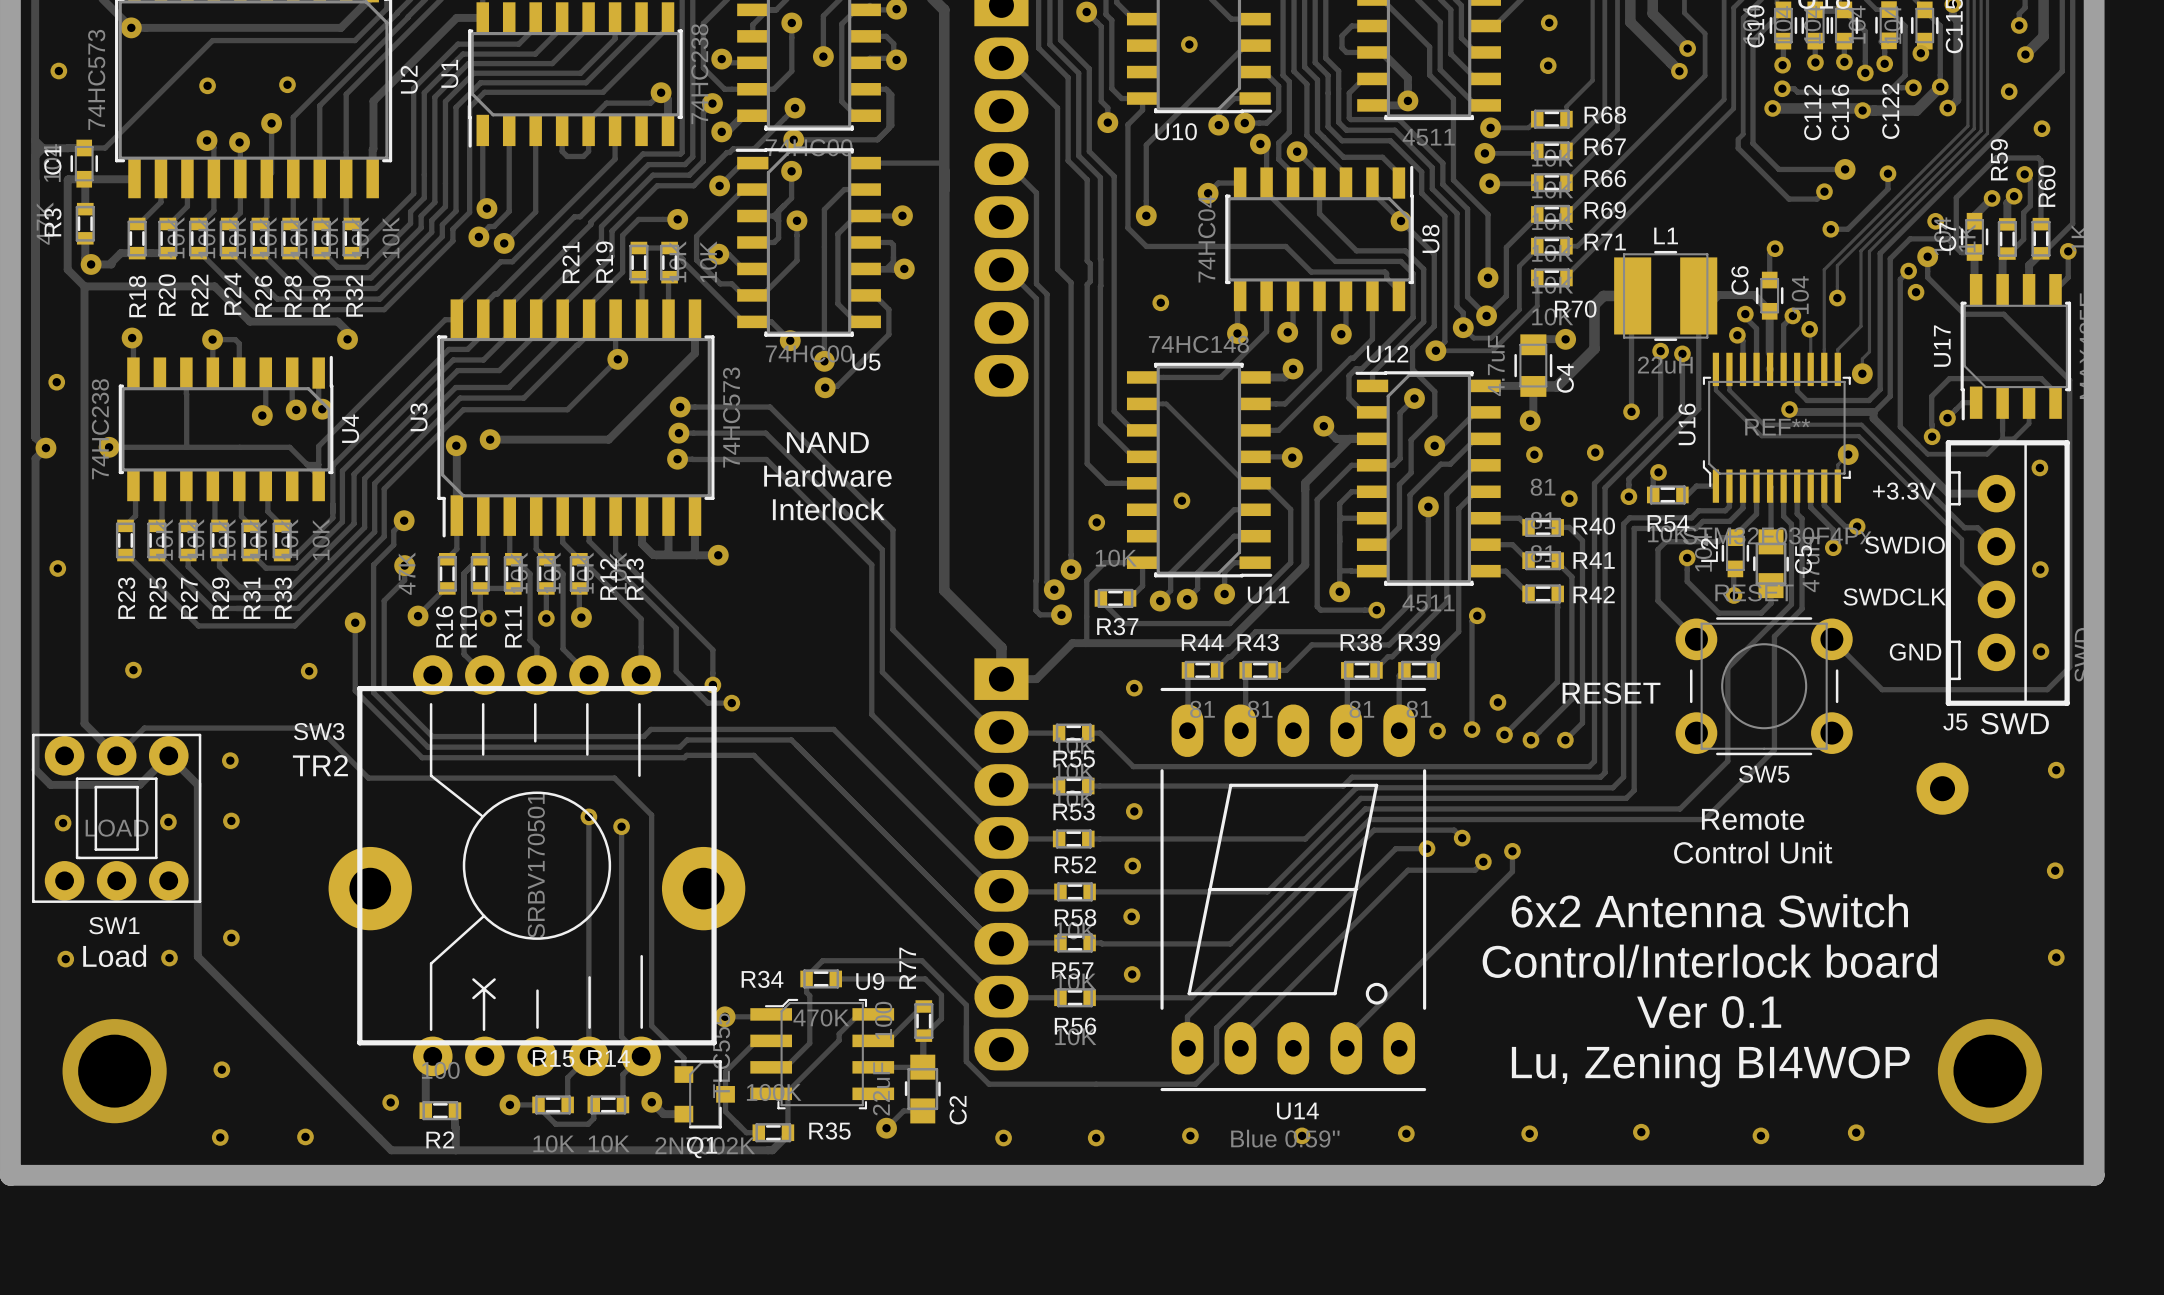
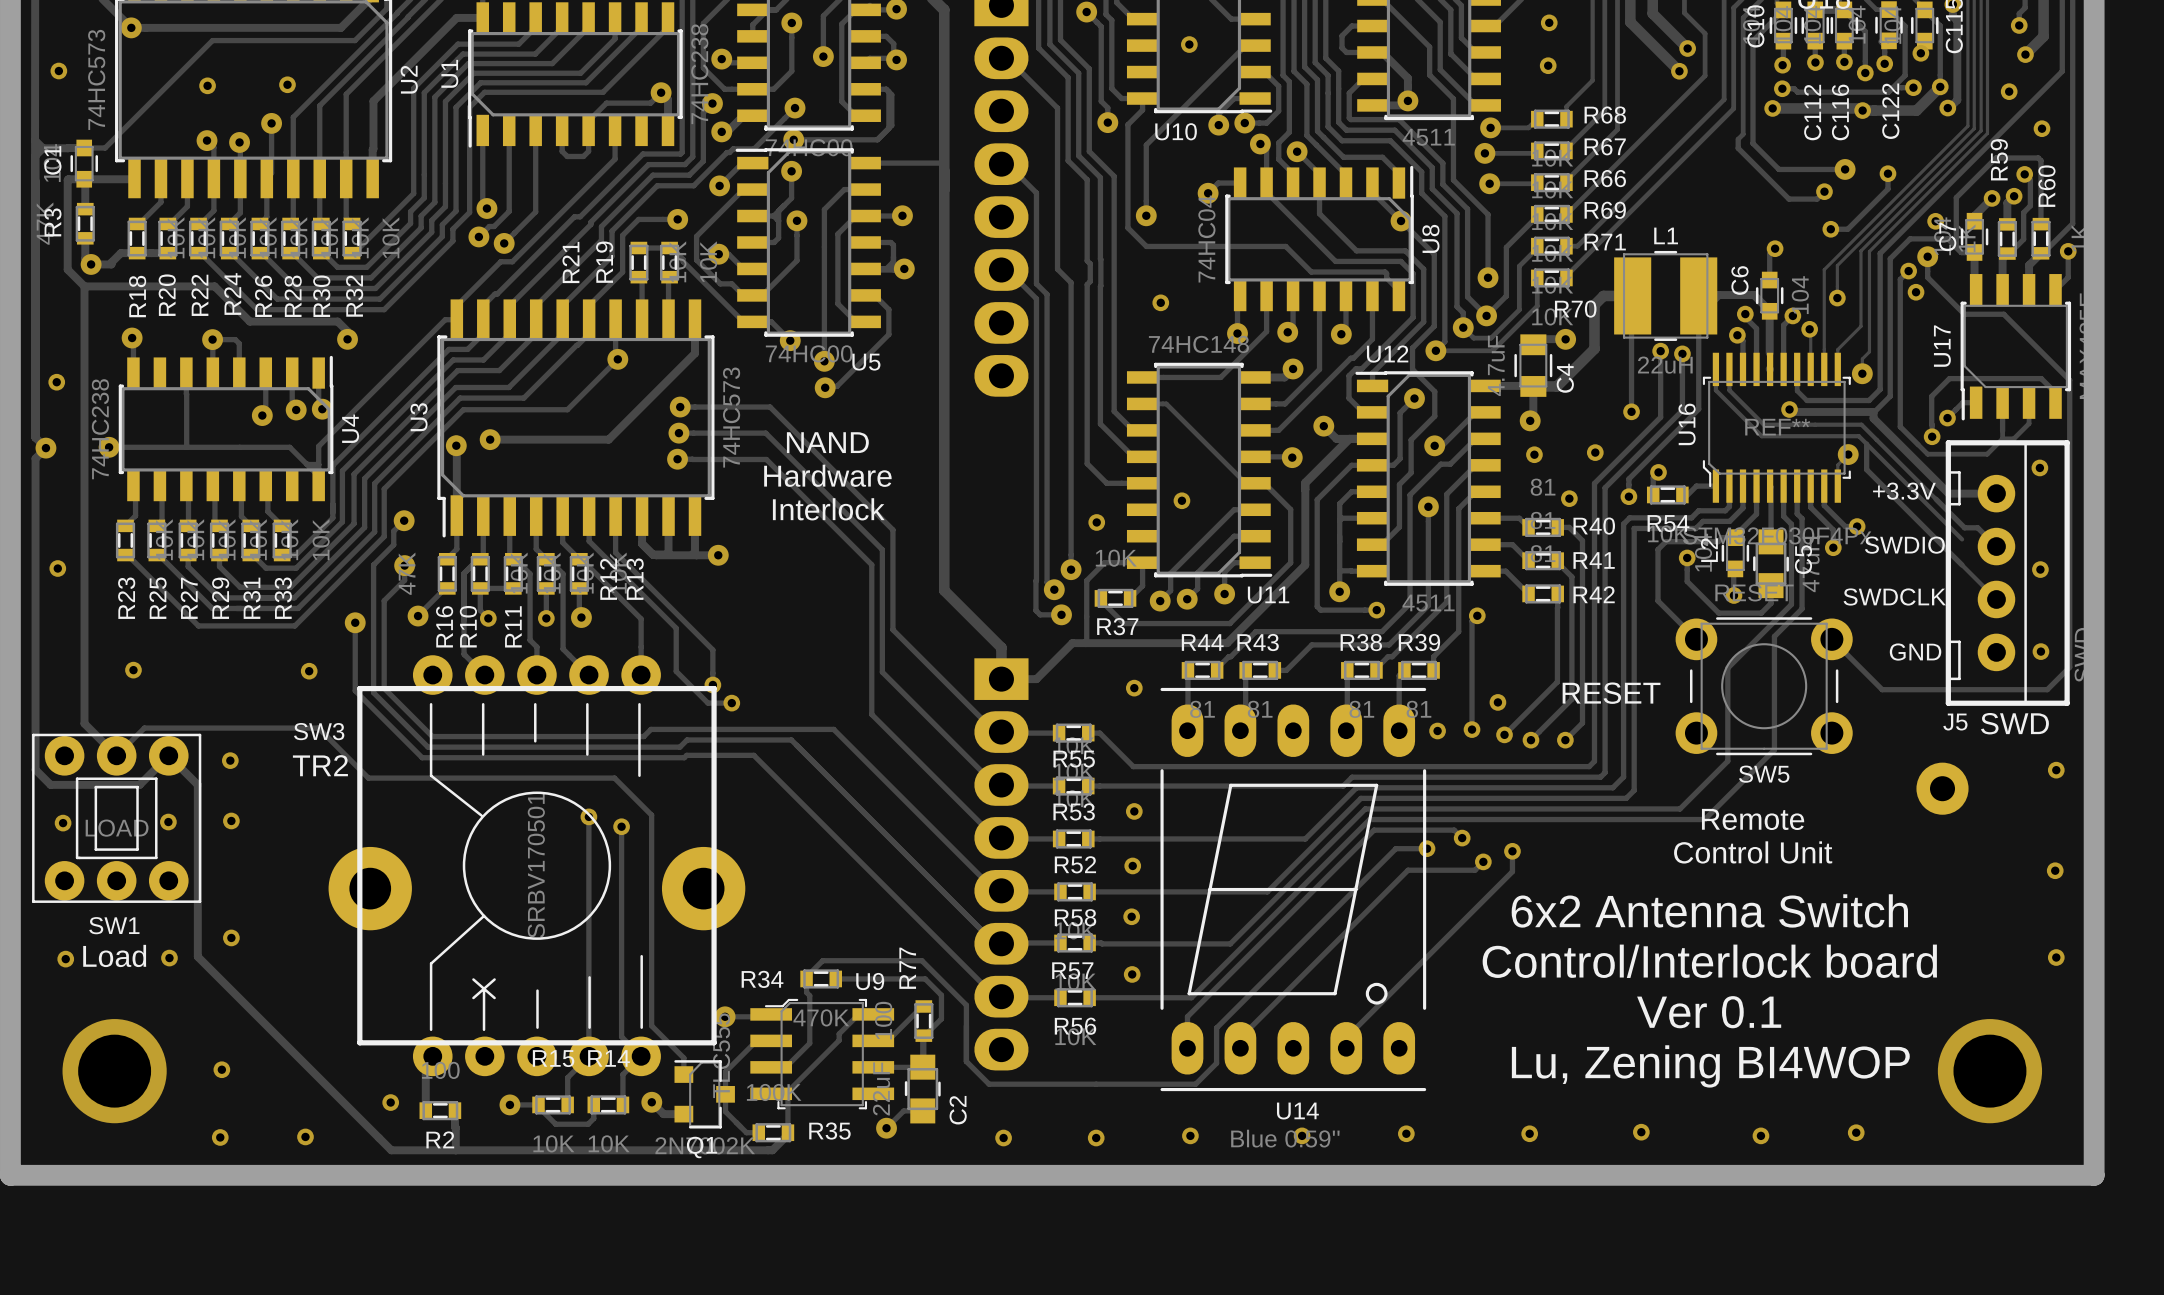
track: (1962, 539) (1962, 565) -> (1866, 444) (1866, 469) (1962, 565)

